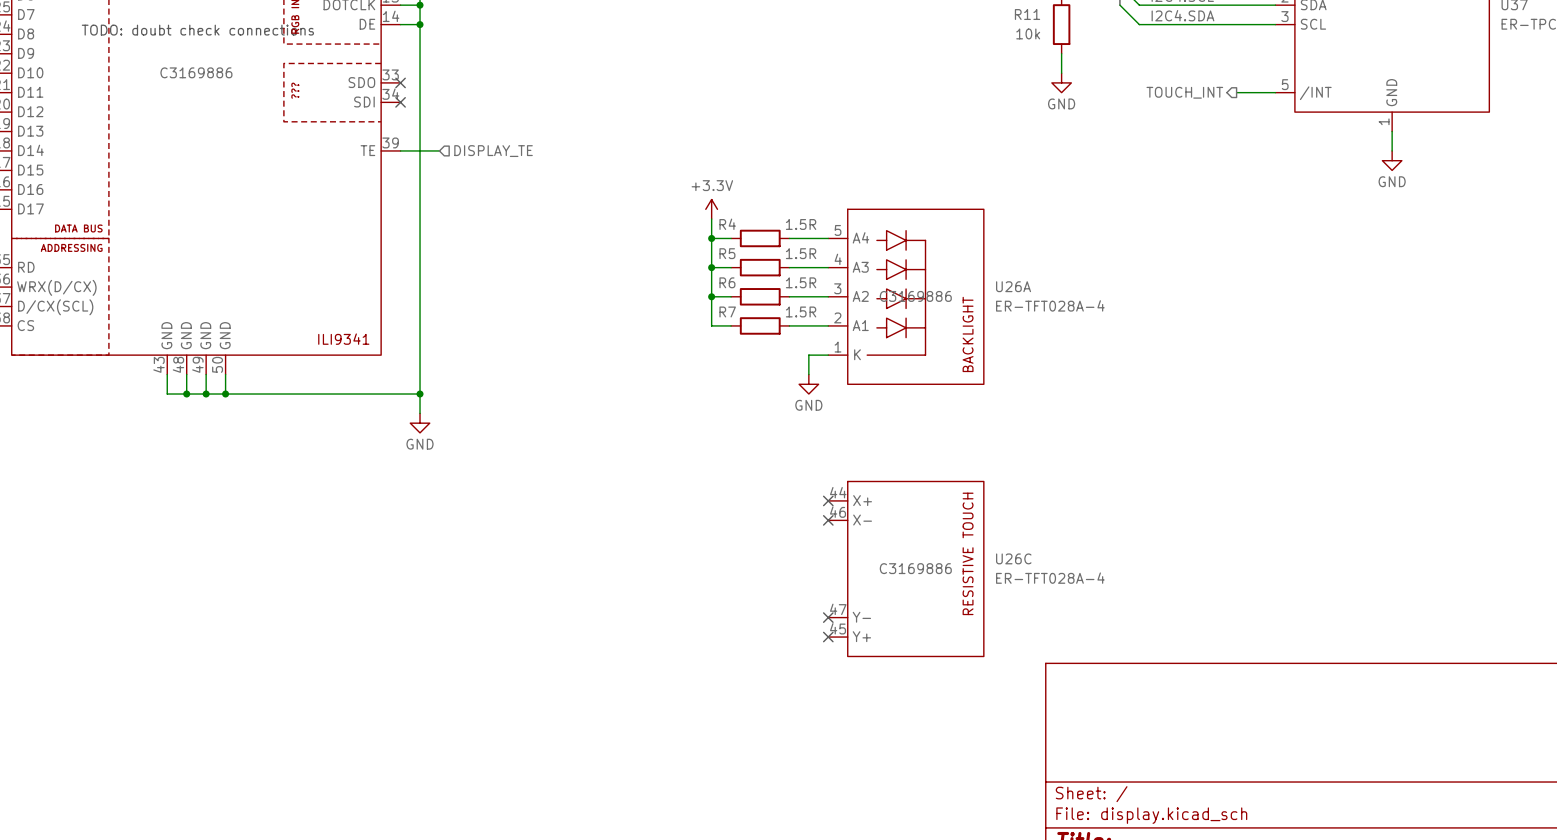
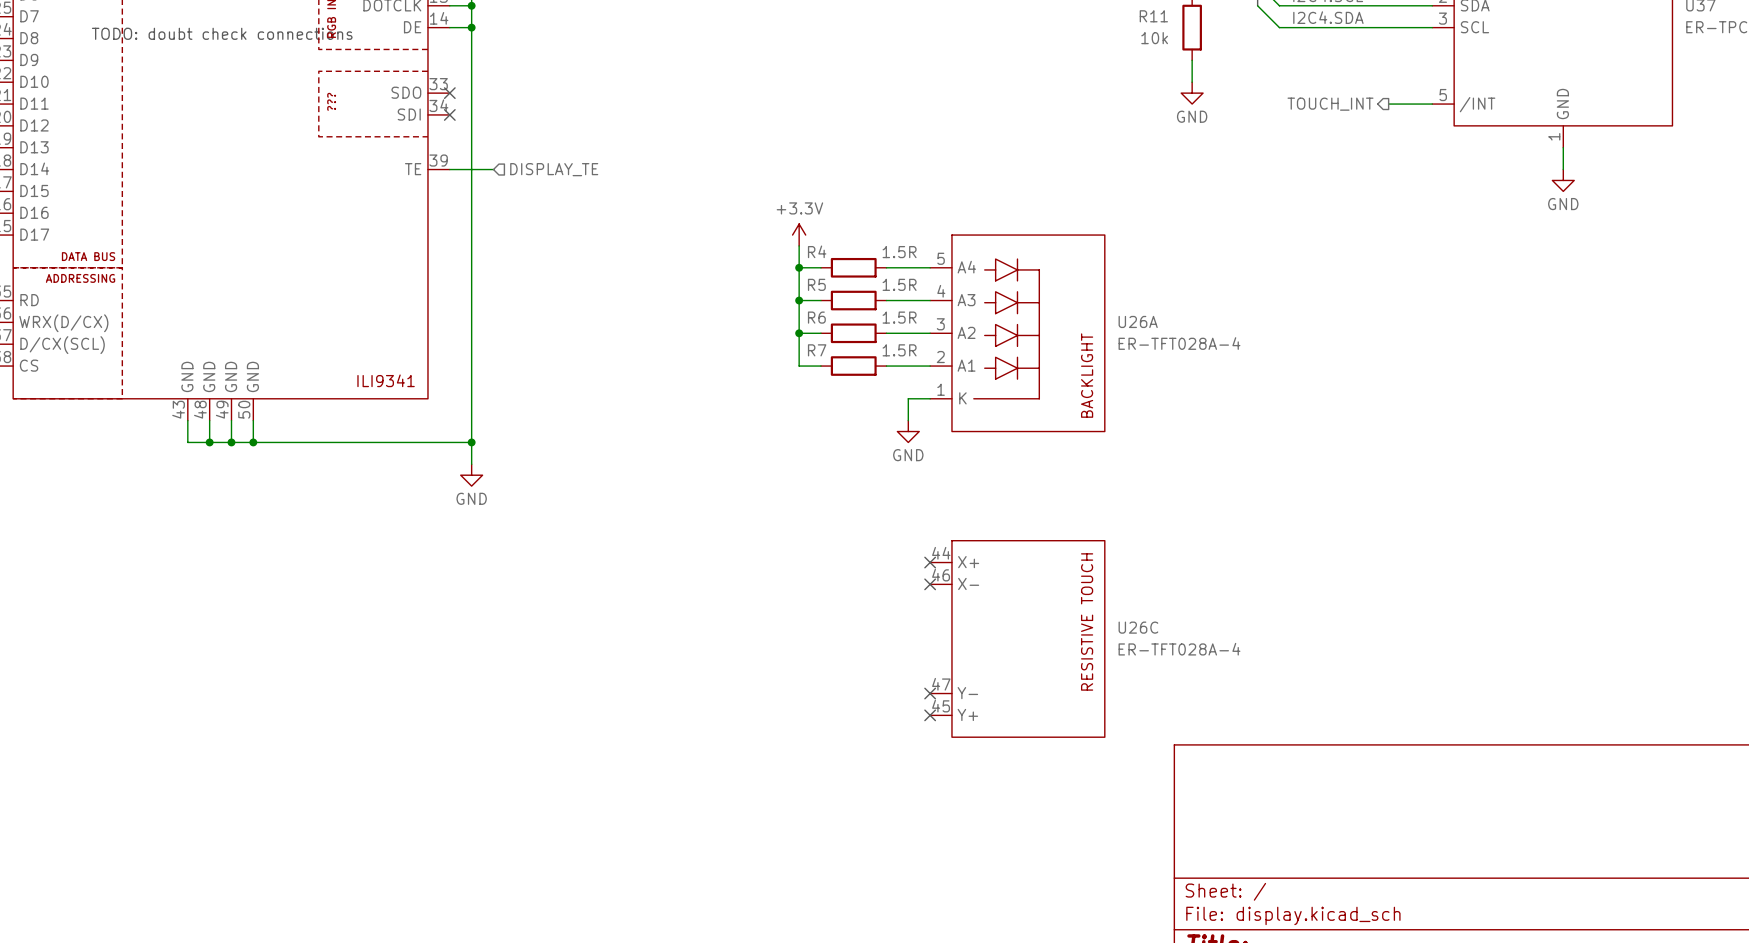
part text: C3169886 (196, 72) -> none
U26A text: C3169886 (915, 296) -> none
U26C text: C3169886 (915, 568) -> none

